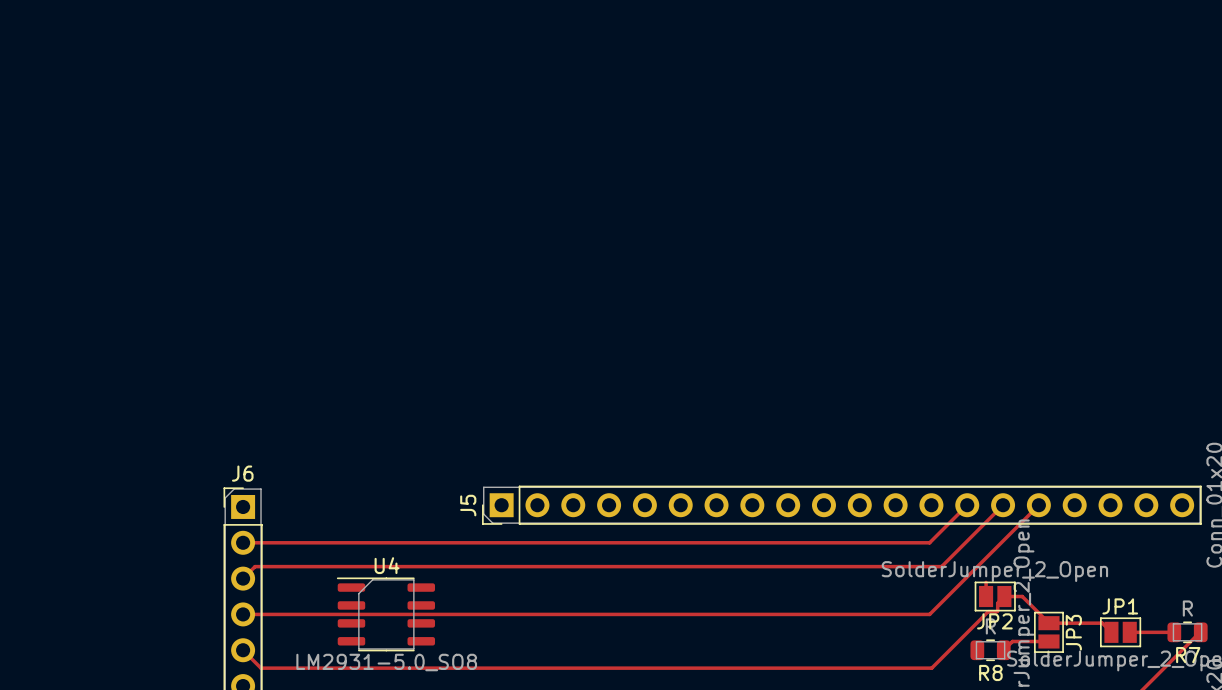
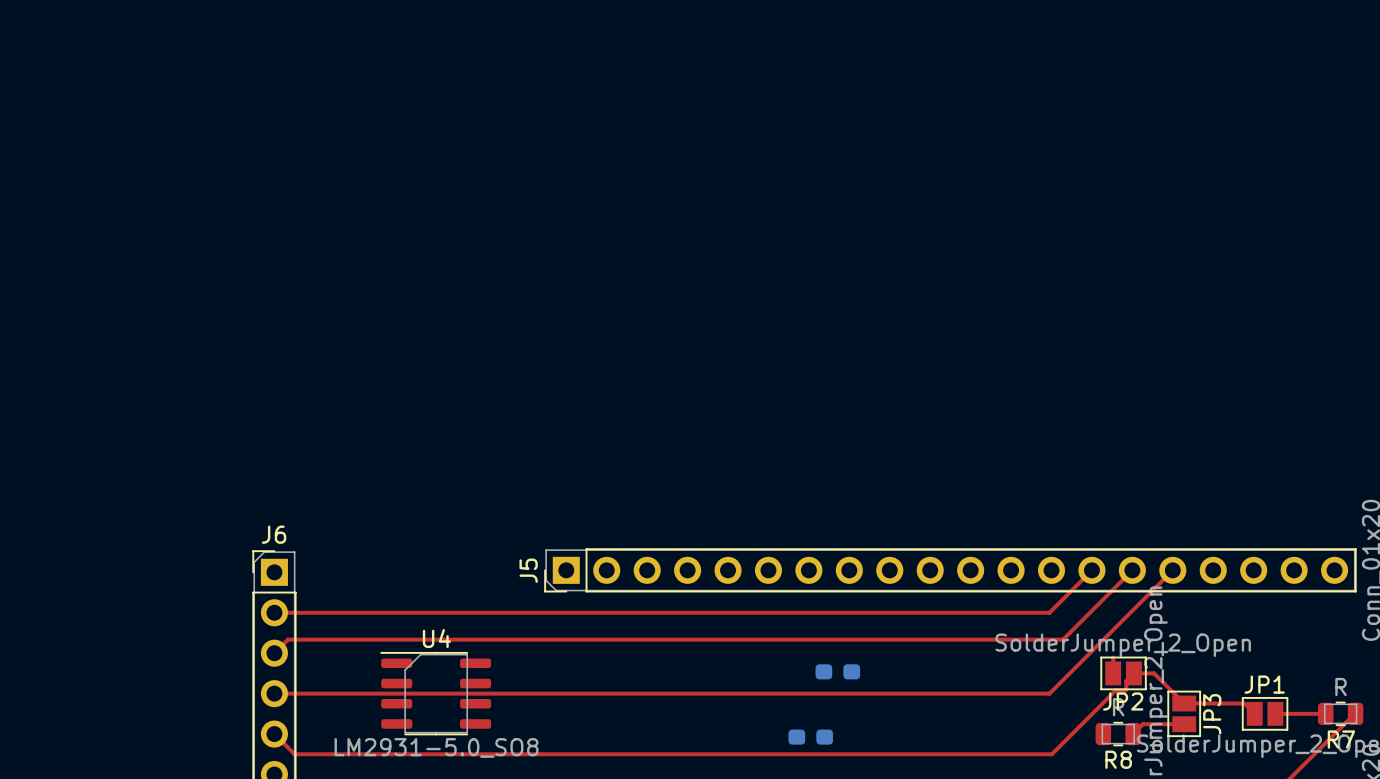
part: none -> (837, 671)
part: none -> (810, 737)

